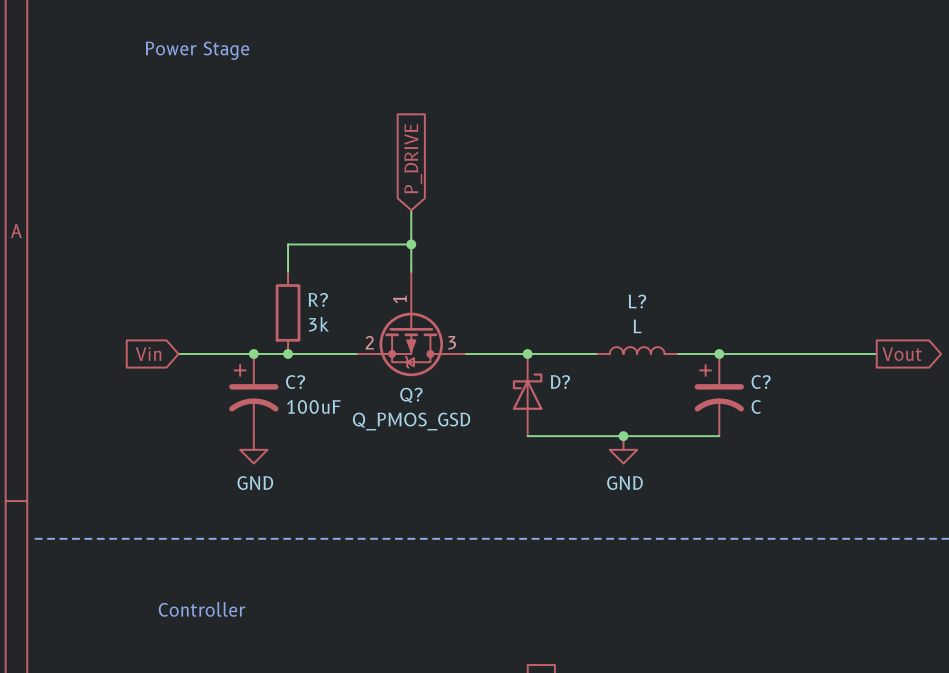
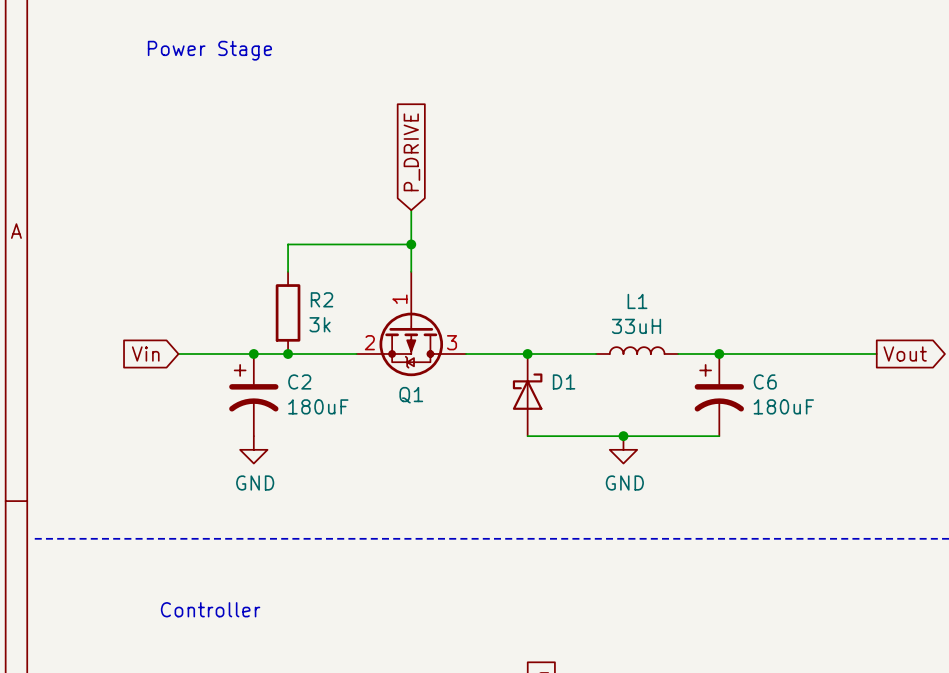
R? name: R? (318, 299) -> R2 (321, 299)
L? name: L? (637, 301) -> L1 (637, 301)
L? value: L (637, 326) -> 33uH (636, 326)
C? name: C? (295, 382) -> C2 (299, 381)
D? name: D? (560, 382) -> D1 (564, 381)
C? name: C? (761, 382) -> C6 (765, 381)
Q? name: Q? (411, 395) -> Q1 (411, 395)
C? value: 100uF (313, 406) -> 180uF (318, 406)
C? value: C (756, 406) -> 180uF (783, 406)
Q? value: Q_PMOS_GSD (411, 421) -> none

